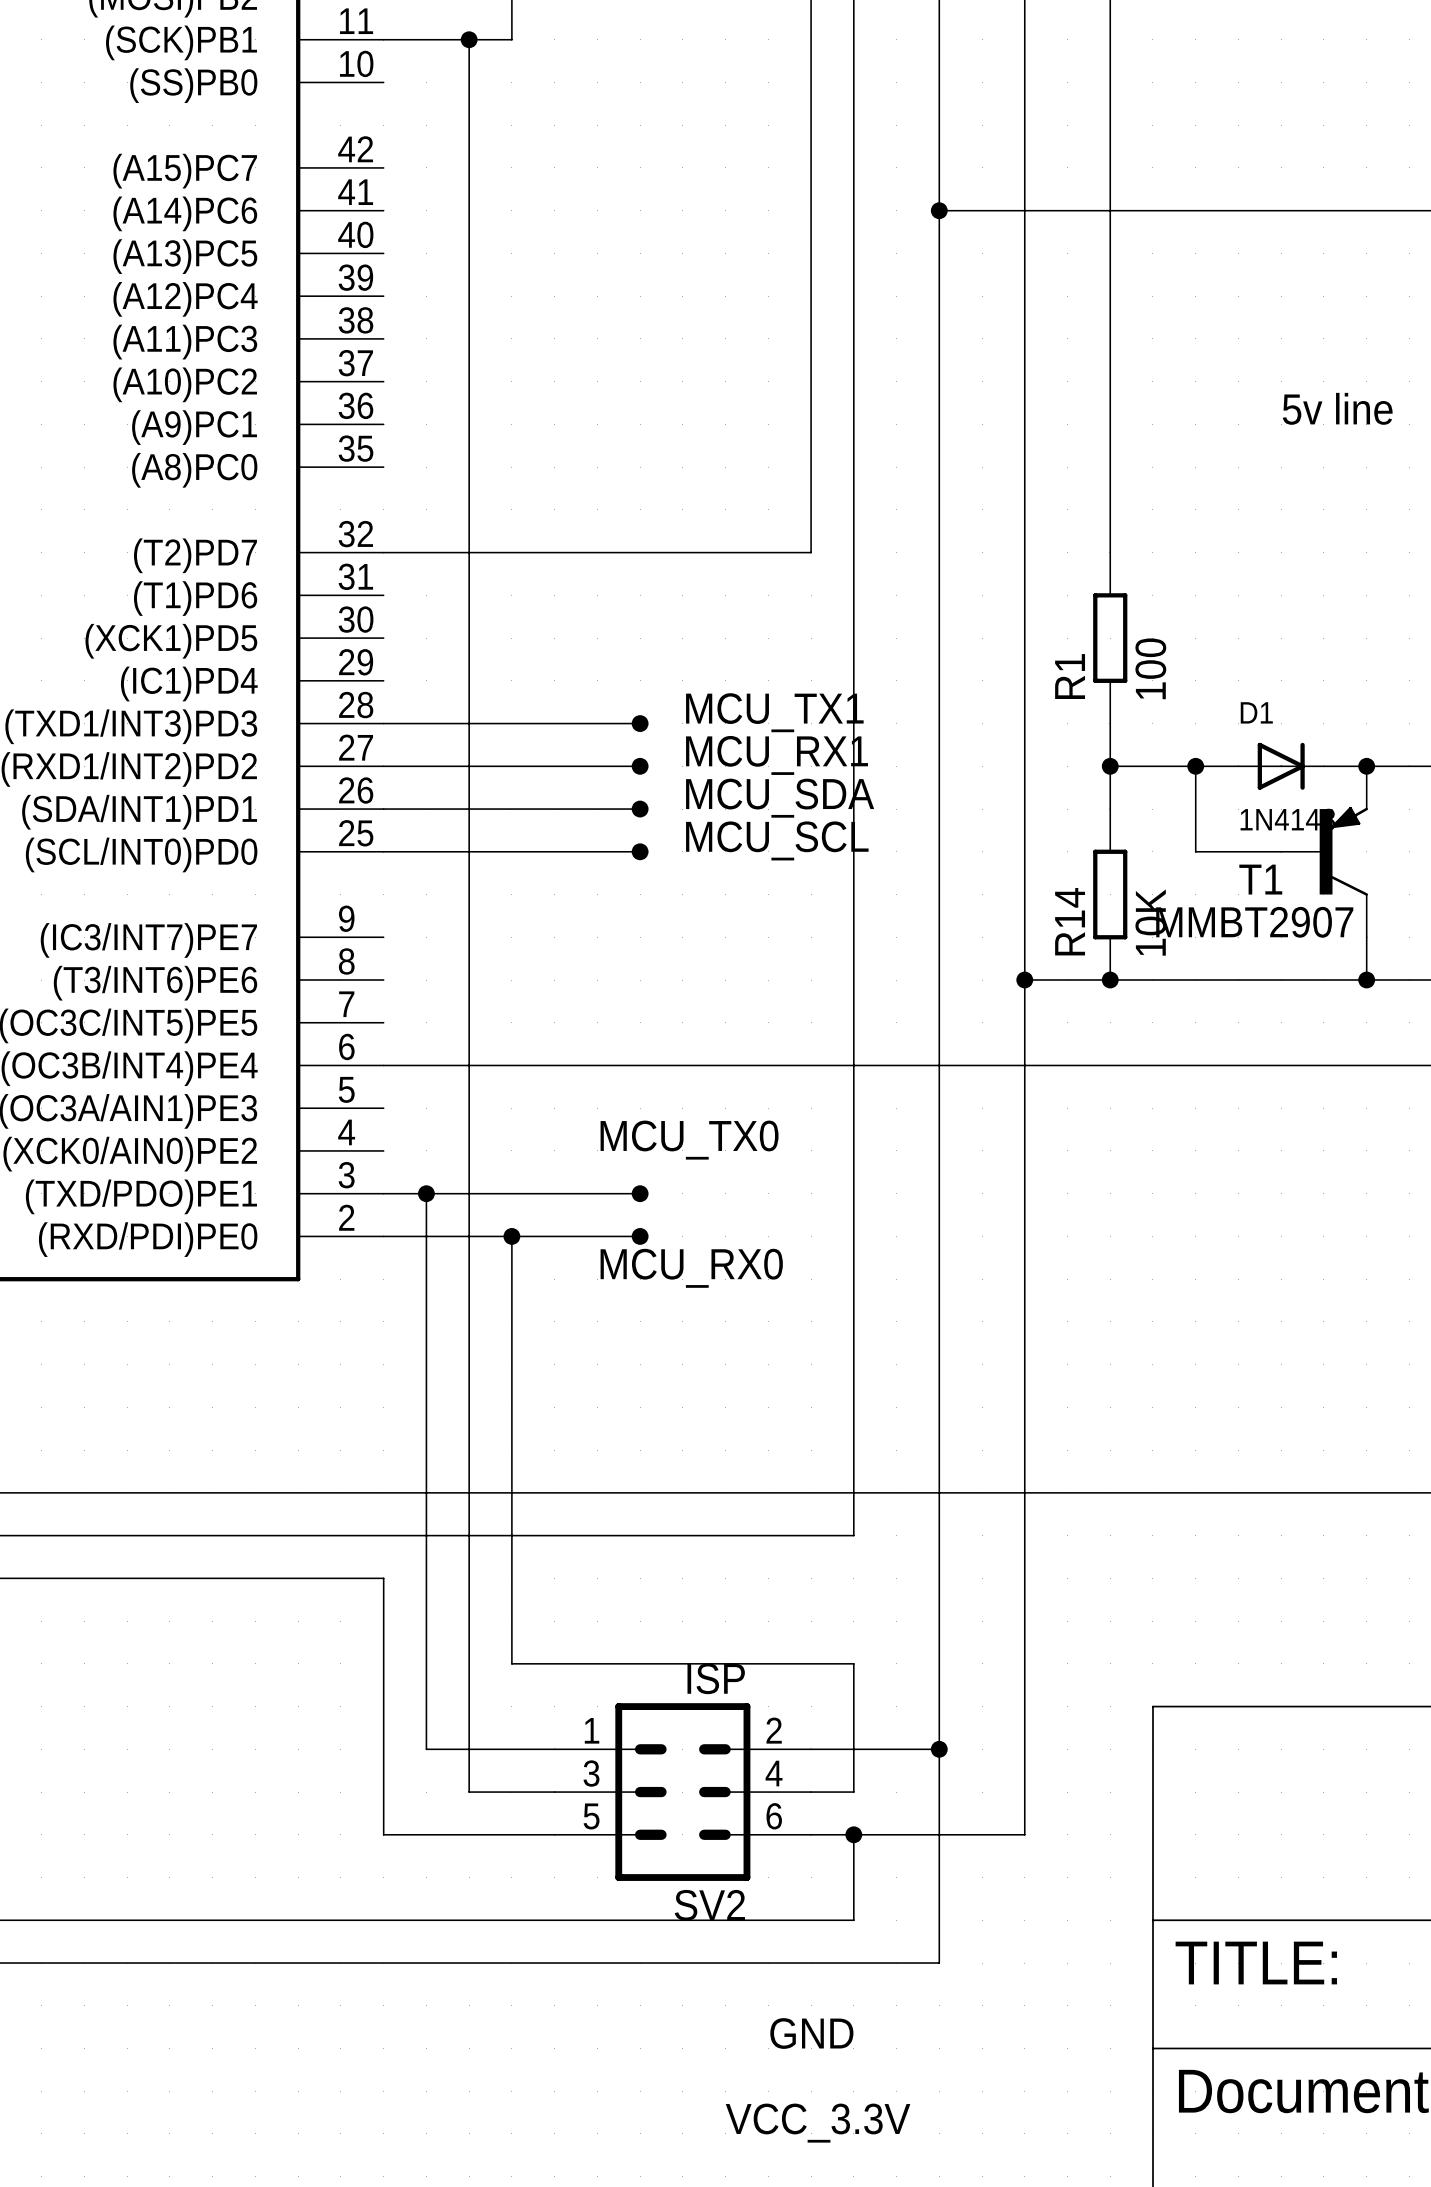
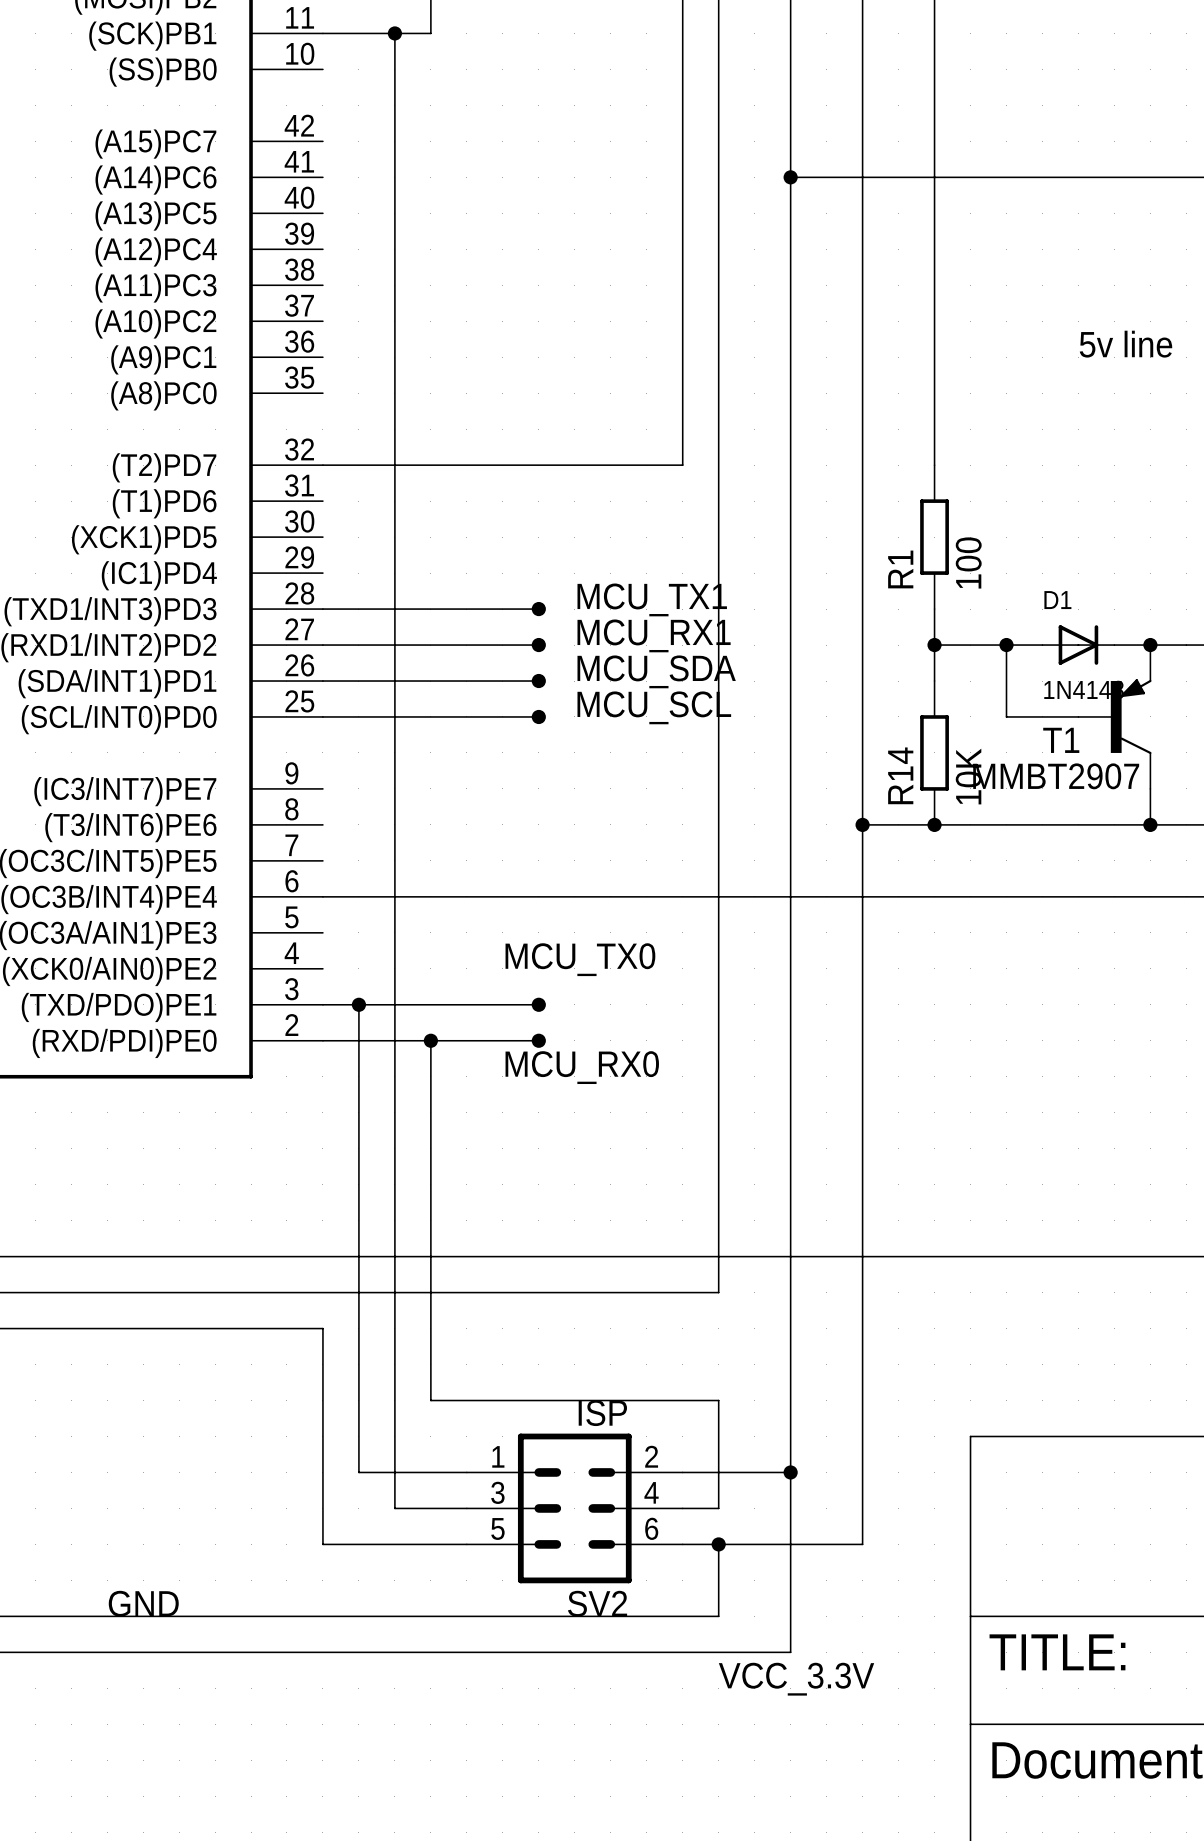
label: none -> GND (143, 1603)
label: GND (811, 2033) -> none
label position: VCC_3.3V (818, 2123) -> VCC_3.3V (796, 1679)

